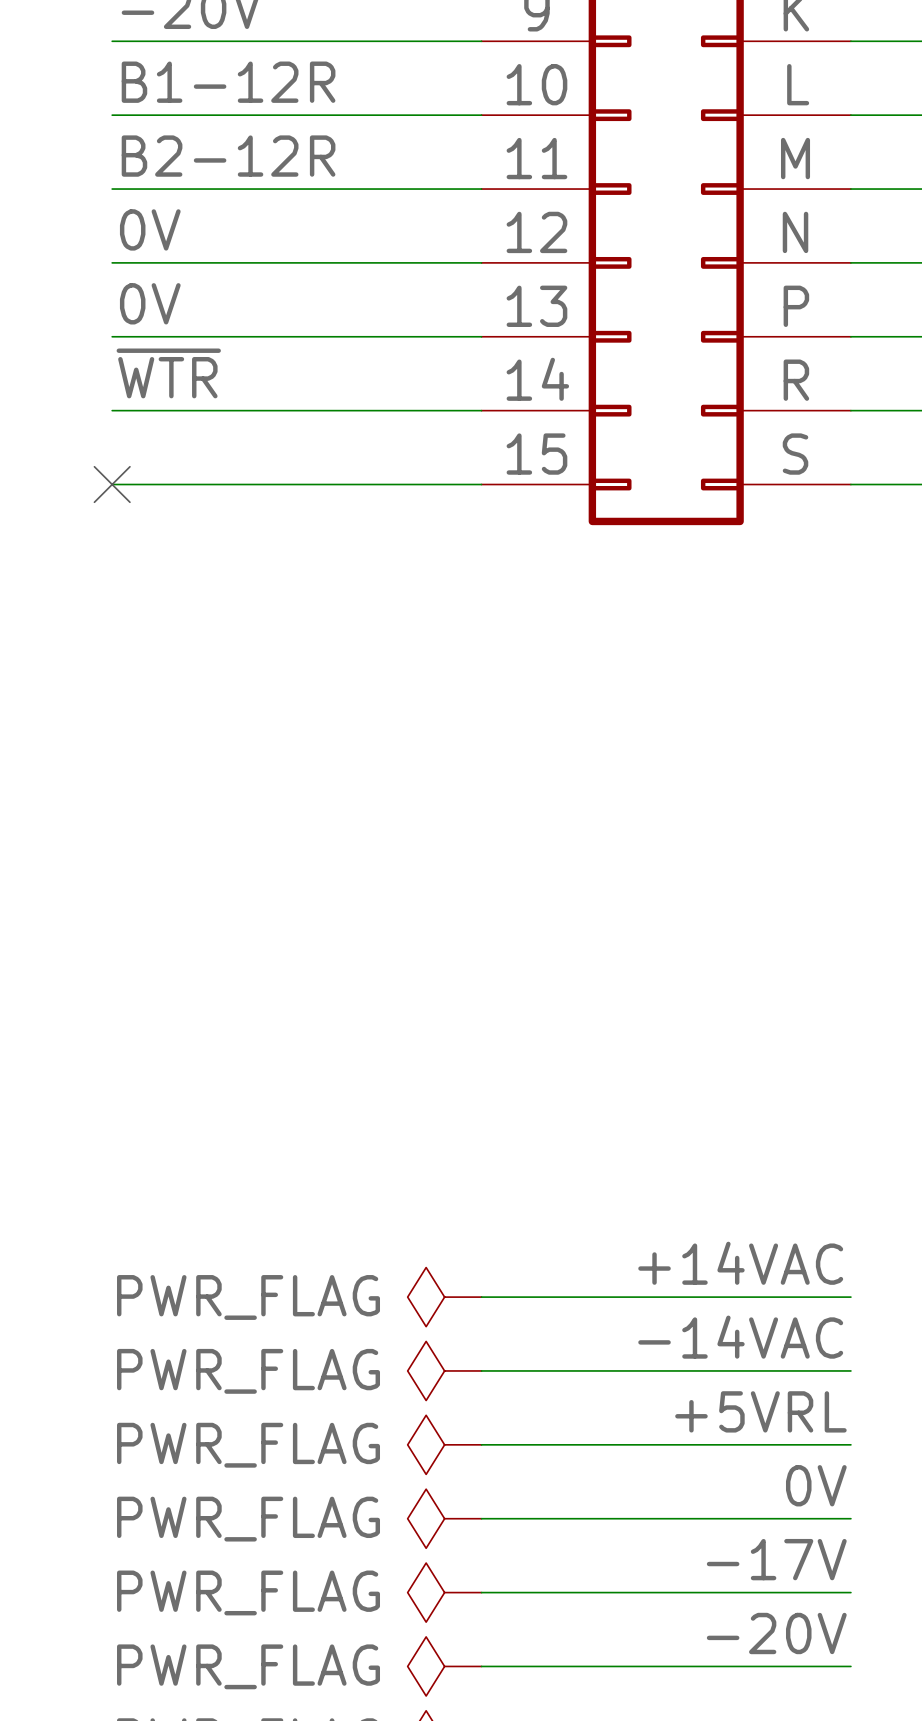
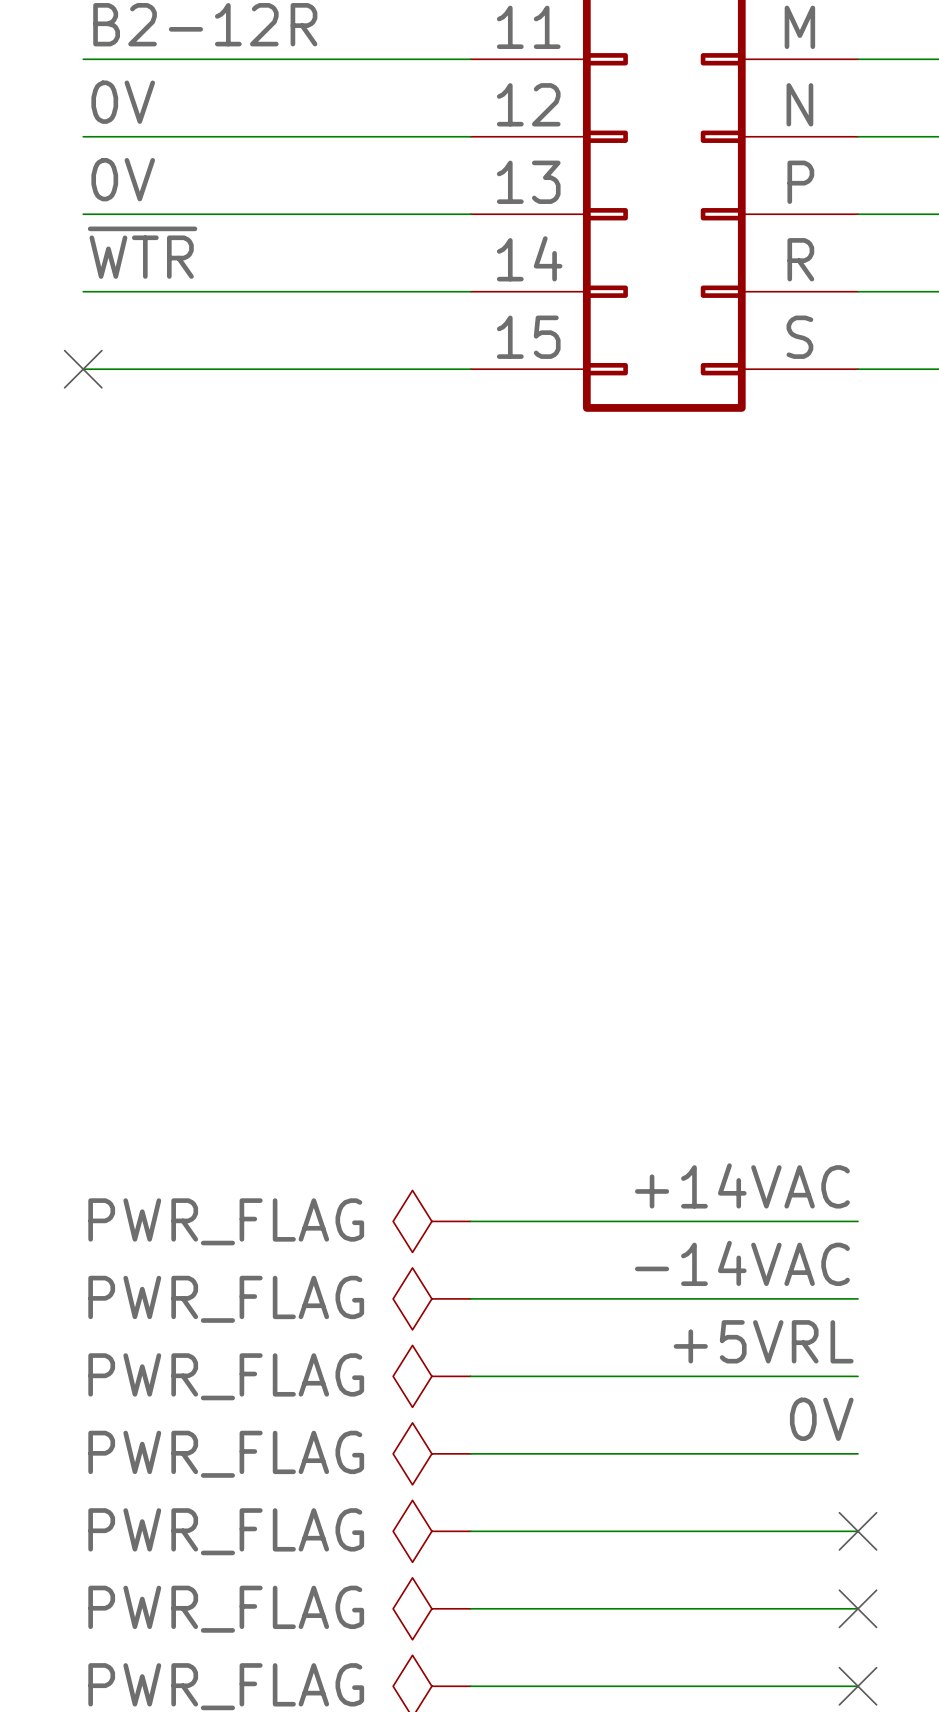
label: -17V (776, 1559) -> none
no-connect mark: none -> (858, 1531)
label: -20V (776, 1633) -> none
no-connect mark: none -> (858, 1608)

